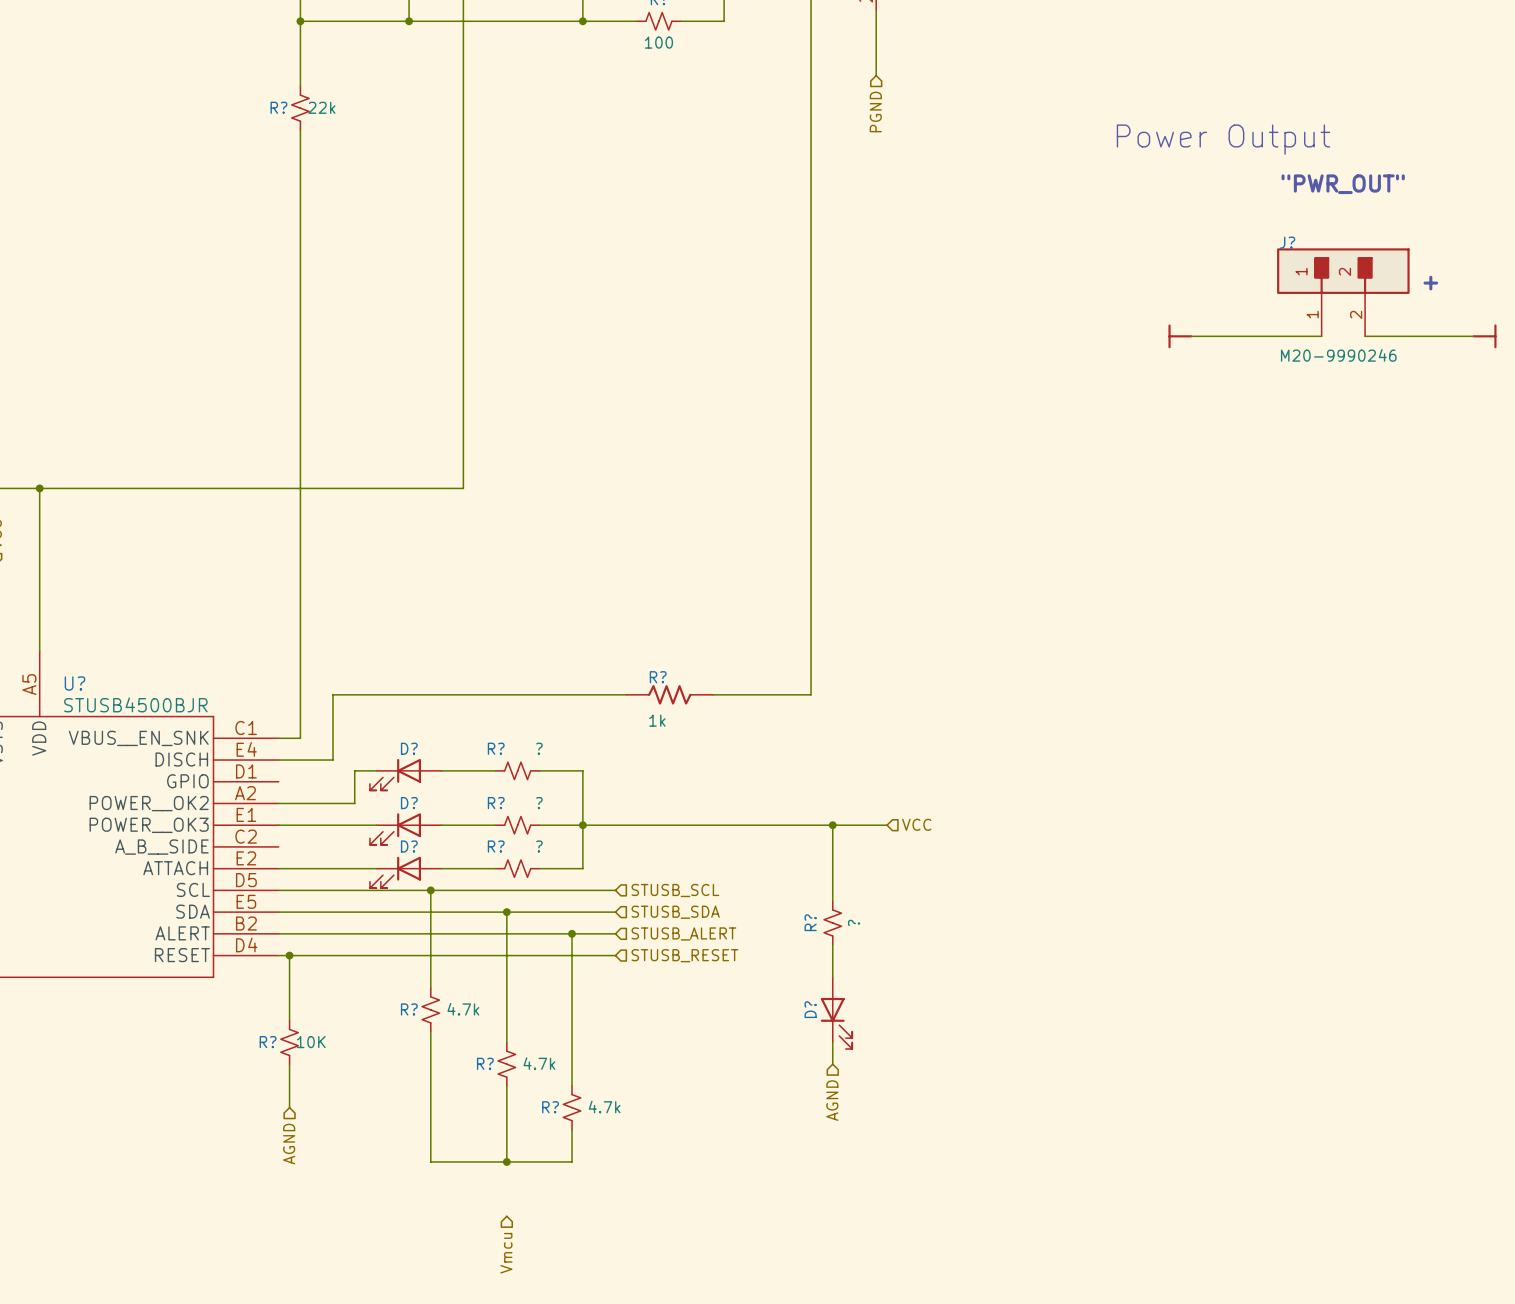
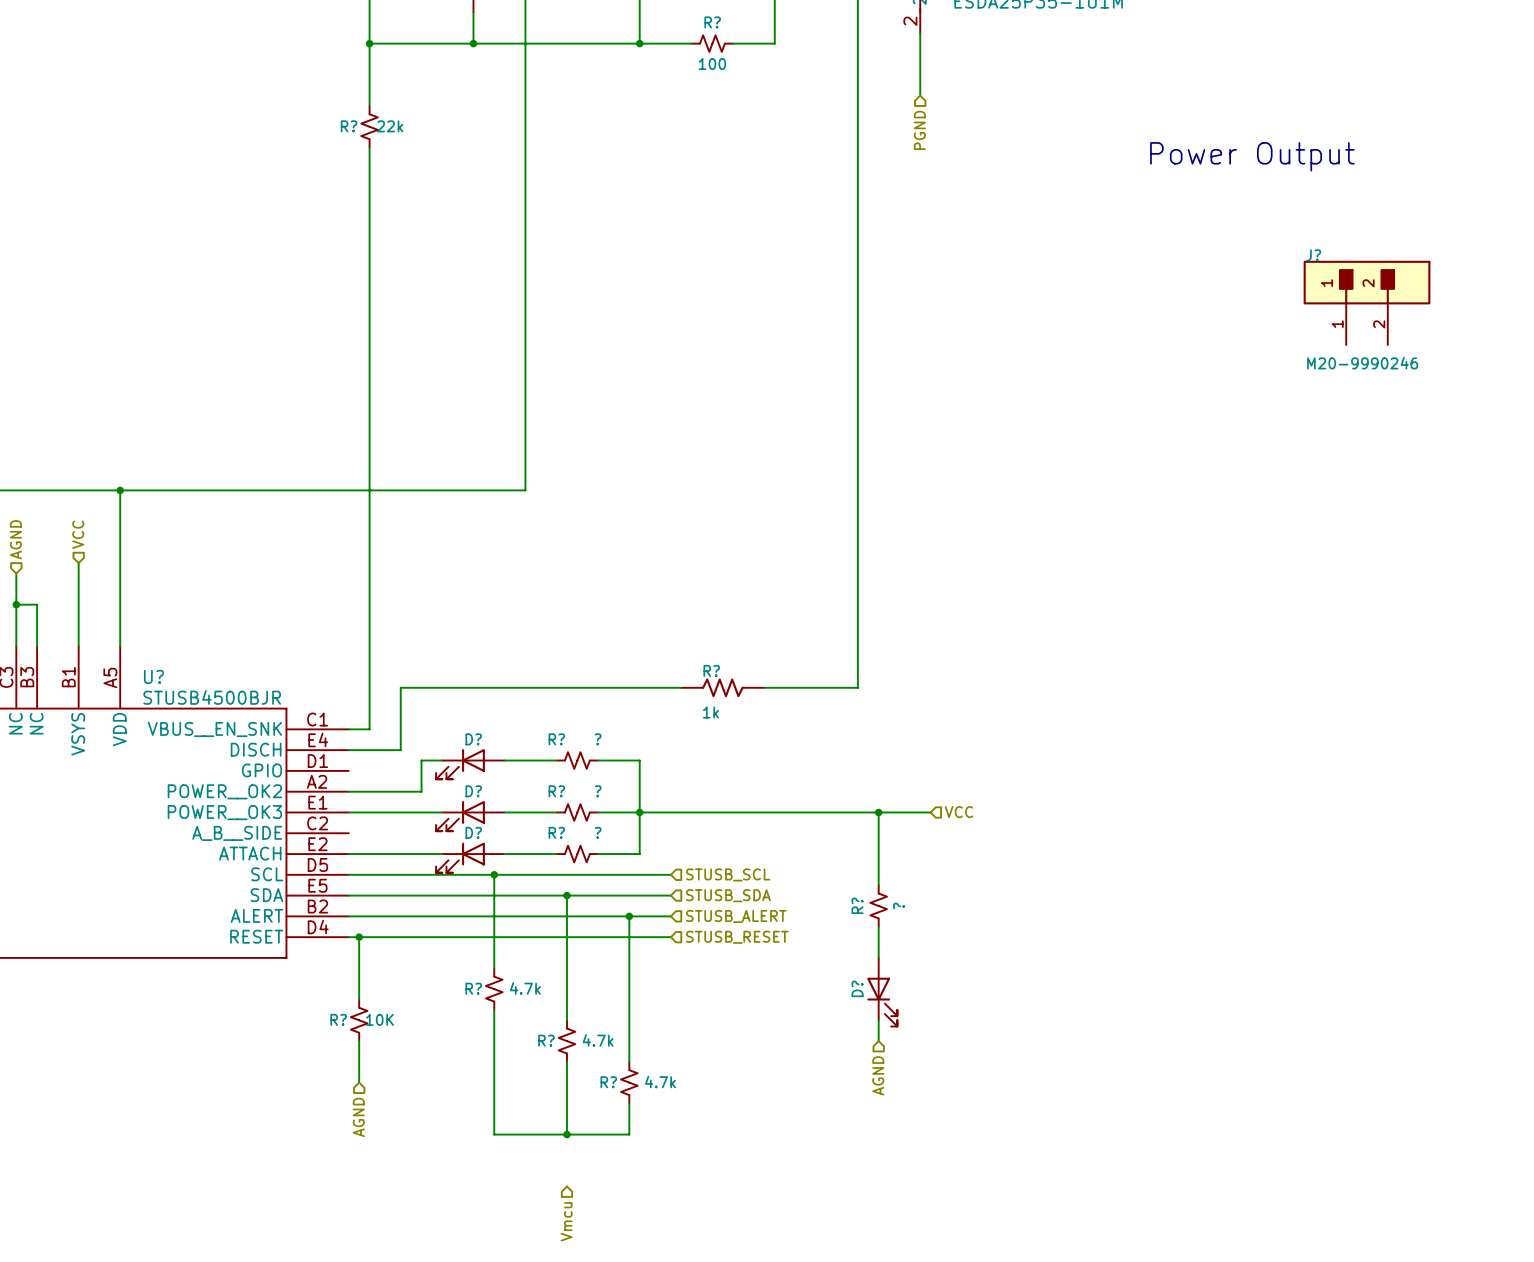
text: "PWR_OUT" (1343, 184) -> none
text: + (1430, 283) -> none
power symbol: (1180, 336) -> none
wire: (1191, 336) (1321, 336) -> none
wire: (1365, 336) (1473, 336) -> none
power symbol: (1484, 336) -> none

